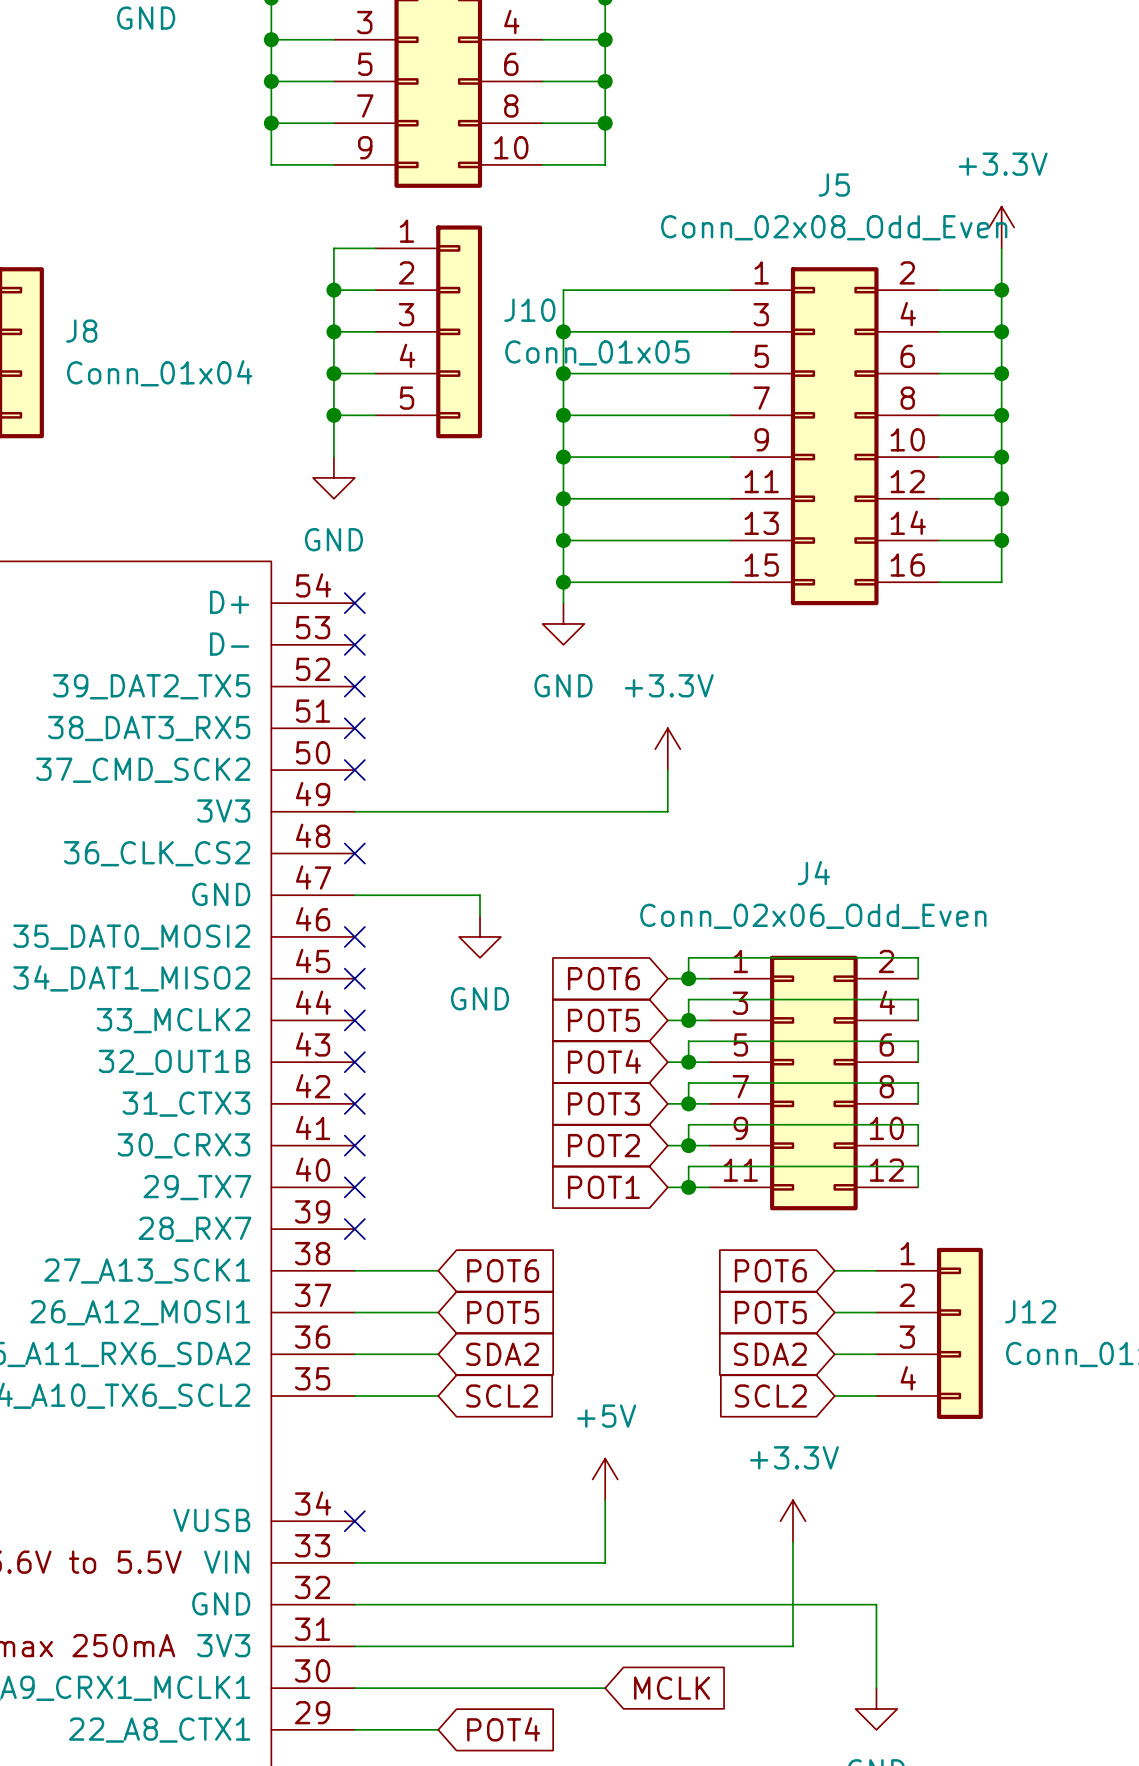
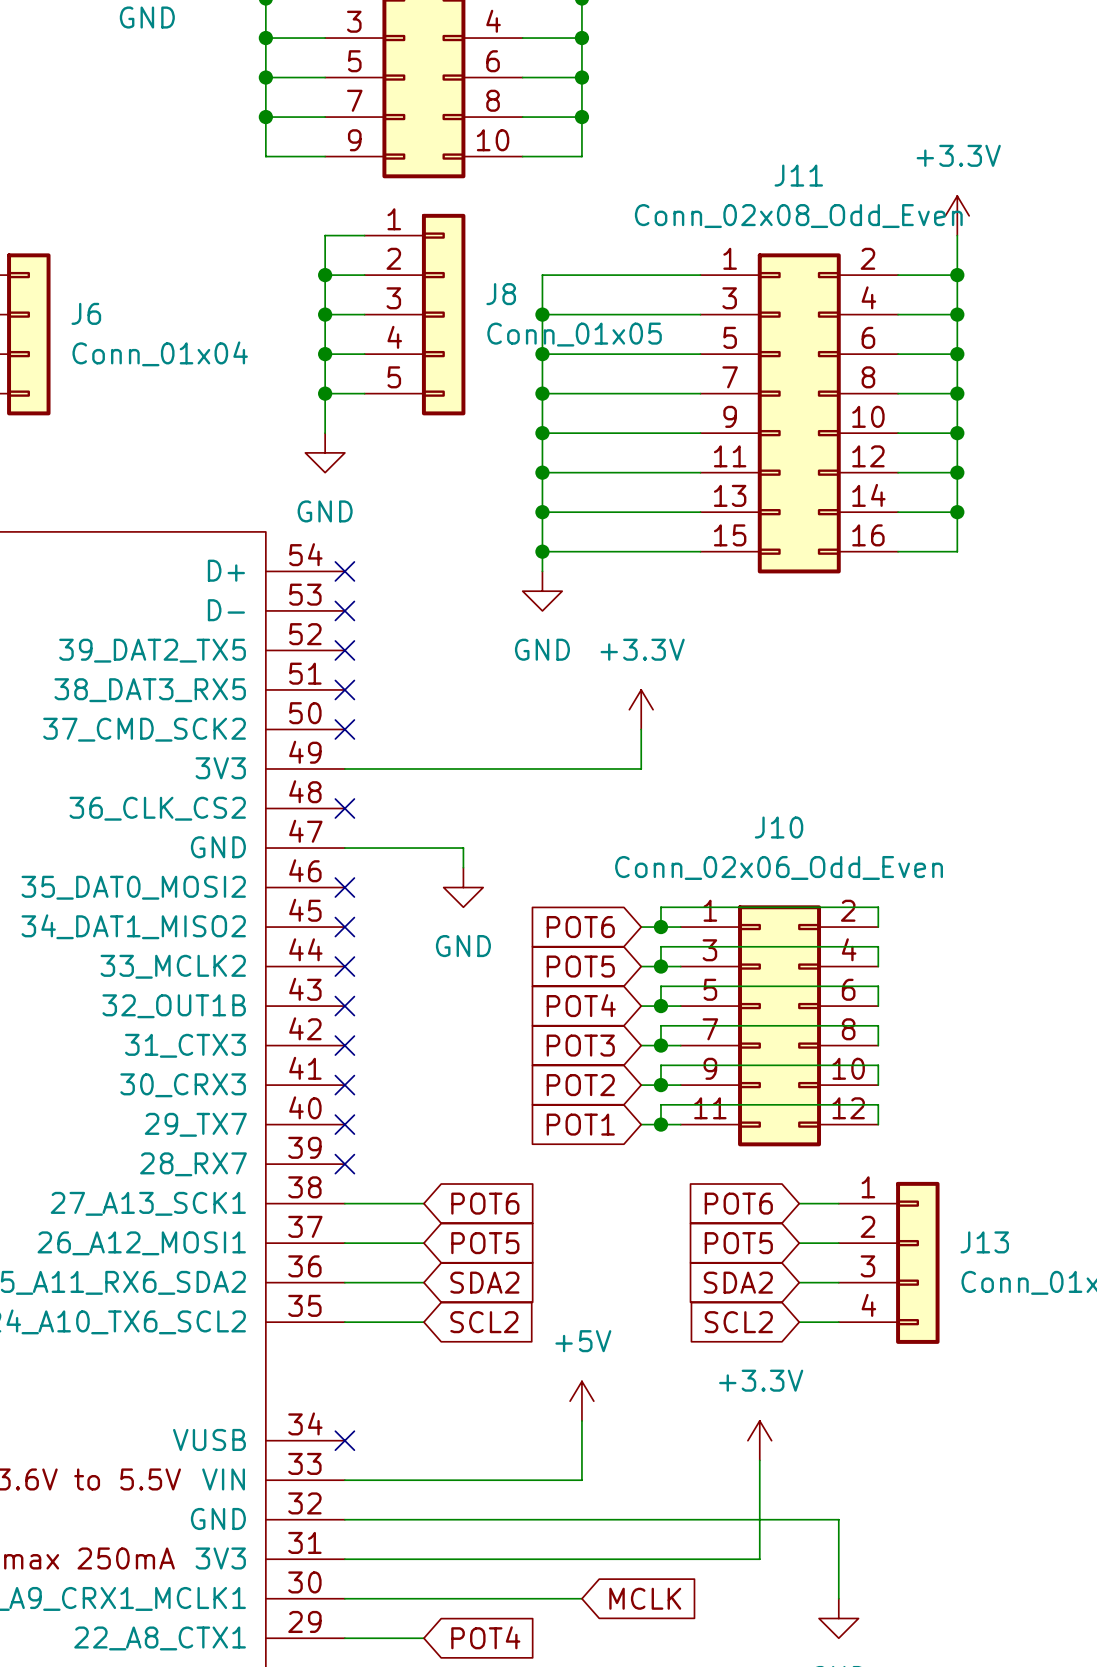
J5 name: J5 (834, 185) -> J11 (798, 175)
J10 name: J10 (529, 310) -> J8 (501, 294)
J8 name: J8 (81, 331) -> J6 (86, 313)
J4 name: J4 (813, 873) -> J10 (779, 827)
J12 name: J12 (1030, 1311) -> J13 (984, 1242)

